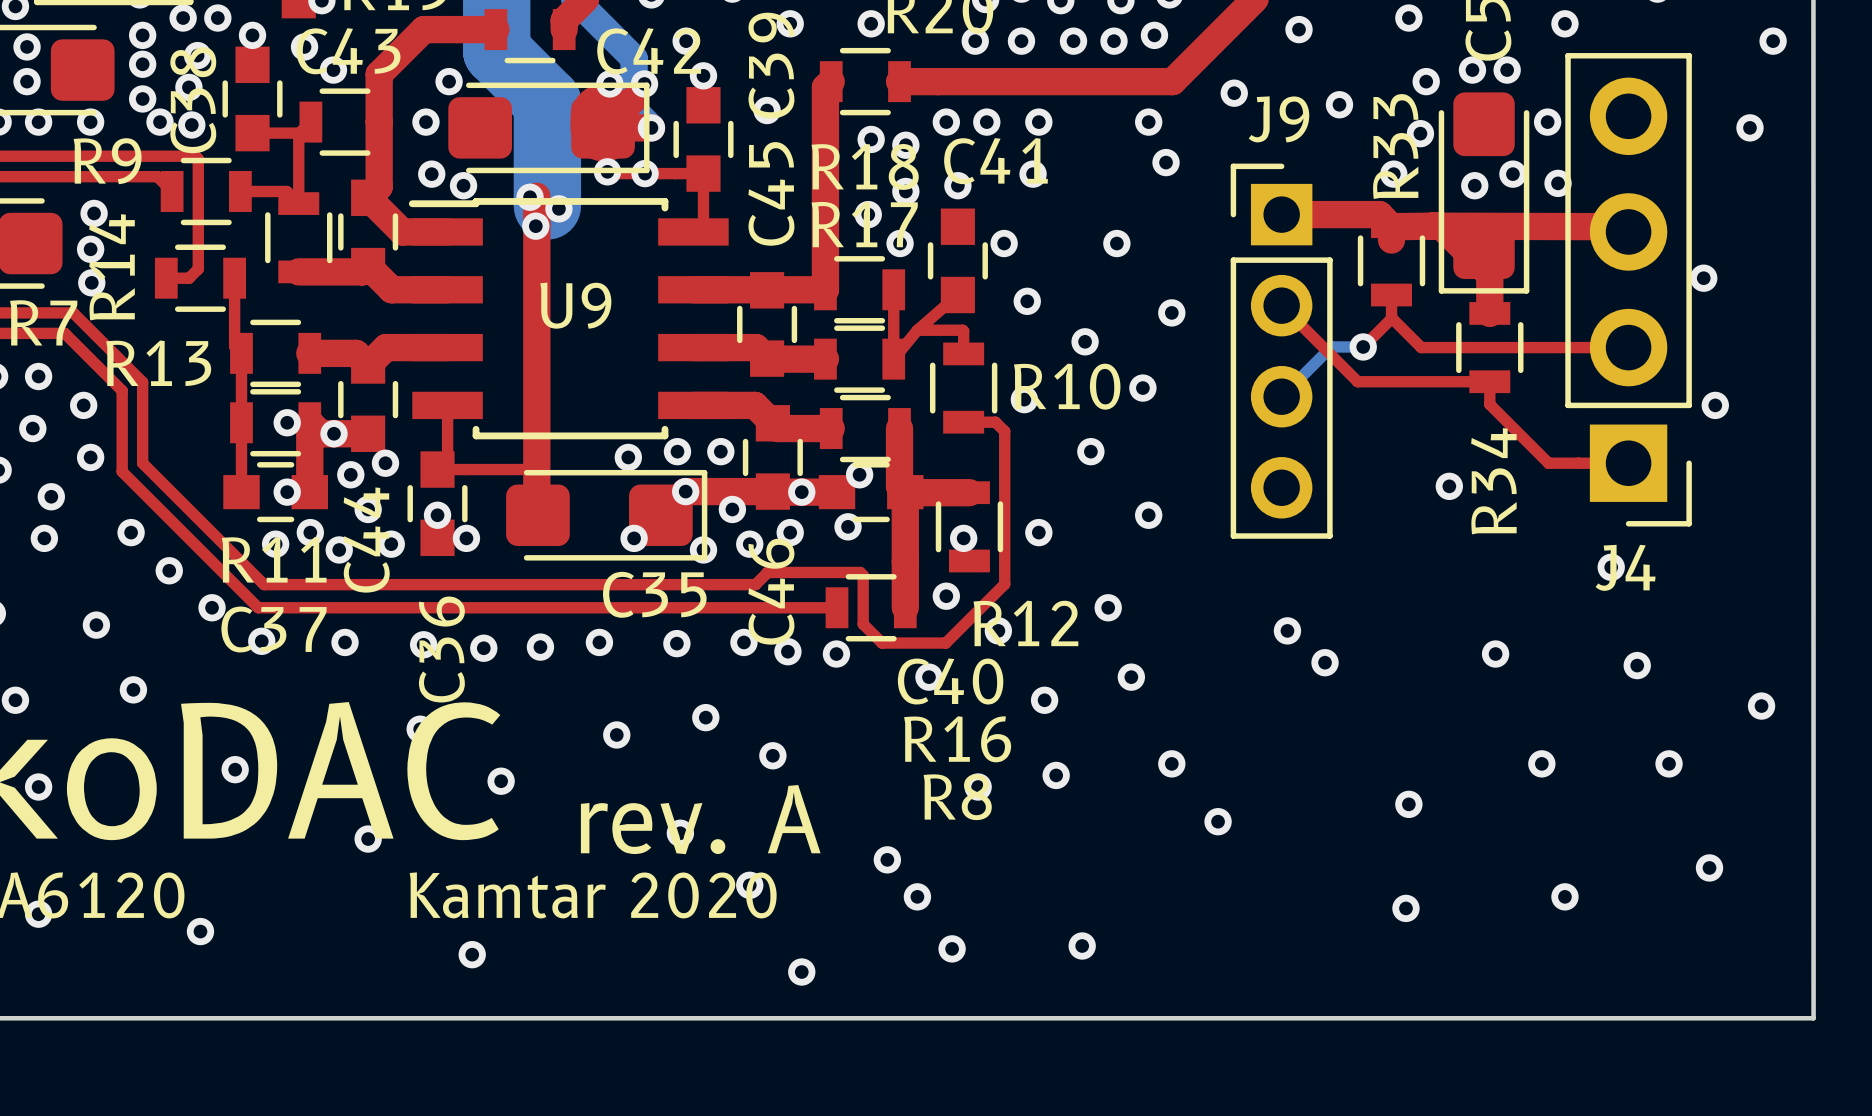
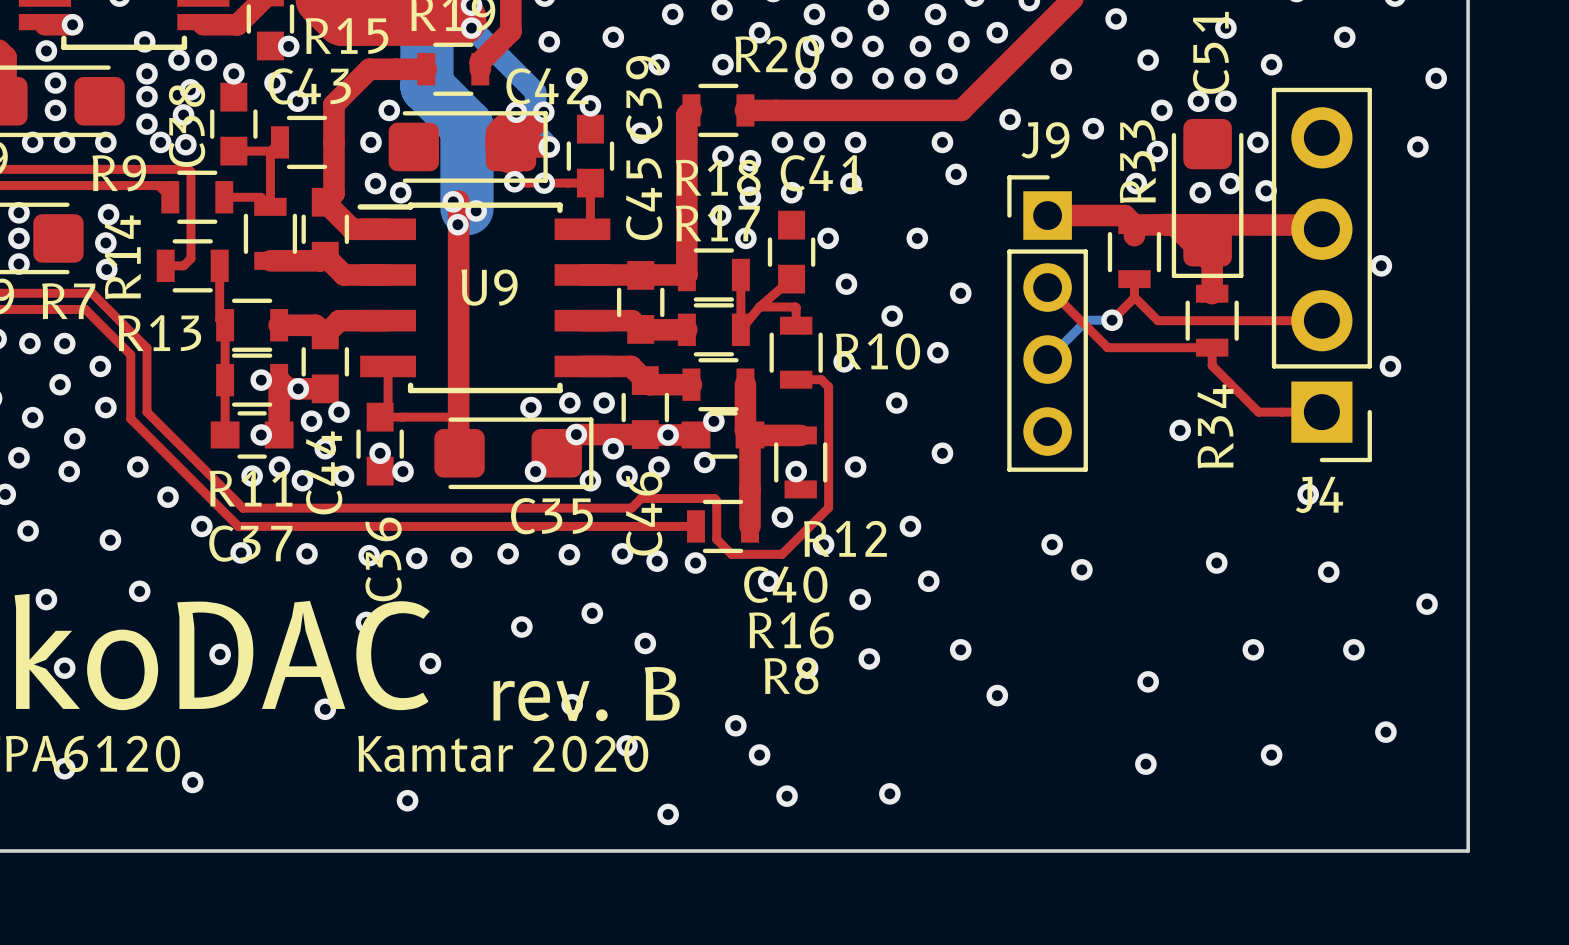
text: rev. A (700, 819) -> rev. B (586, 694)

